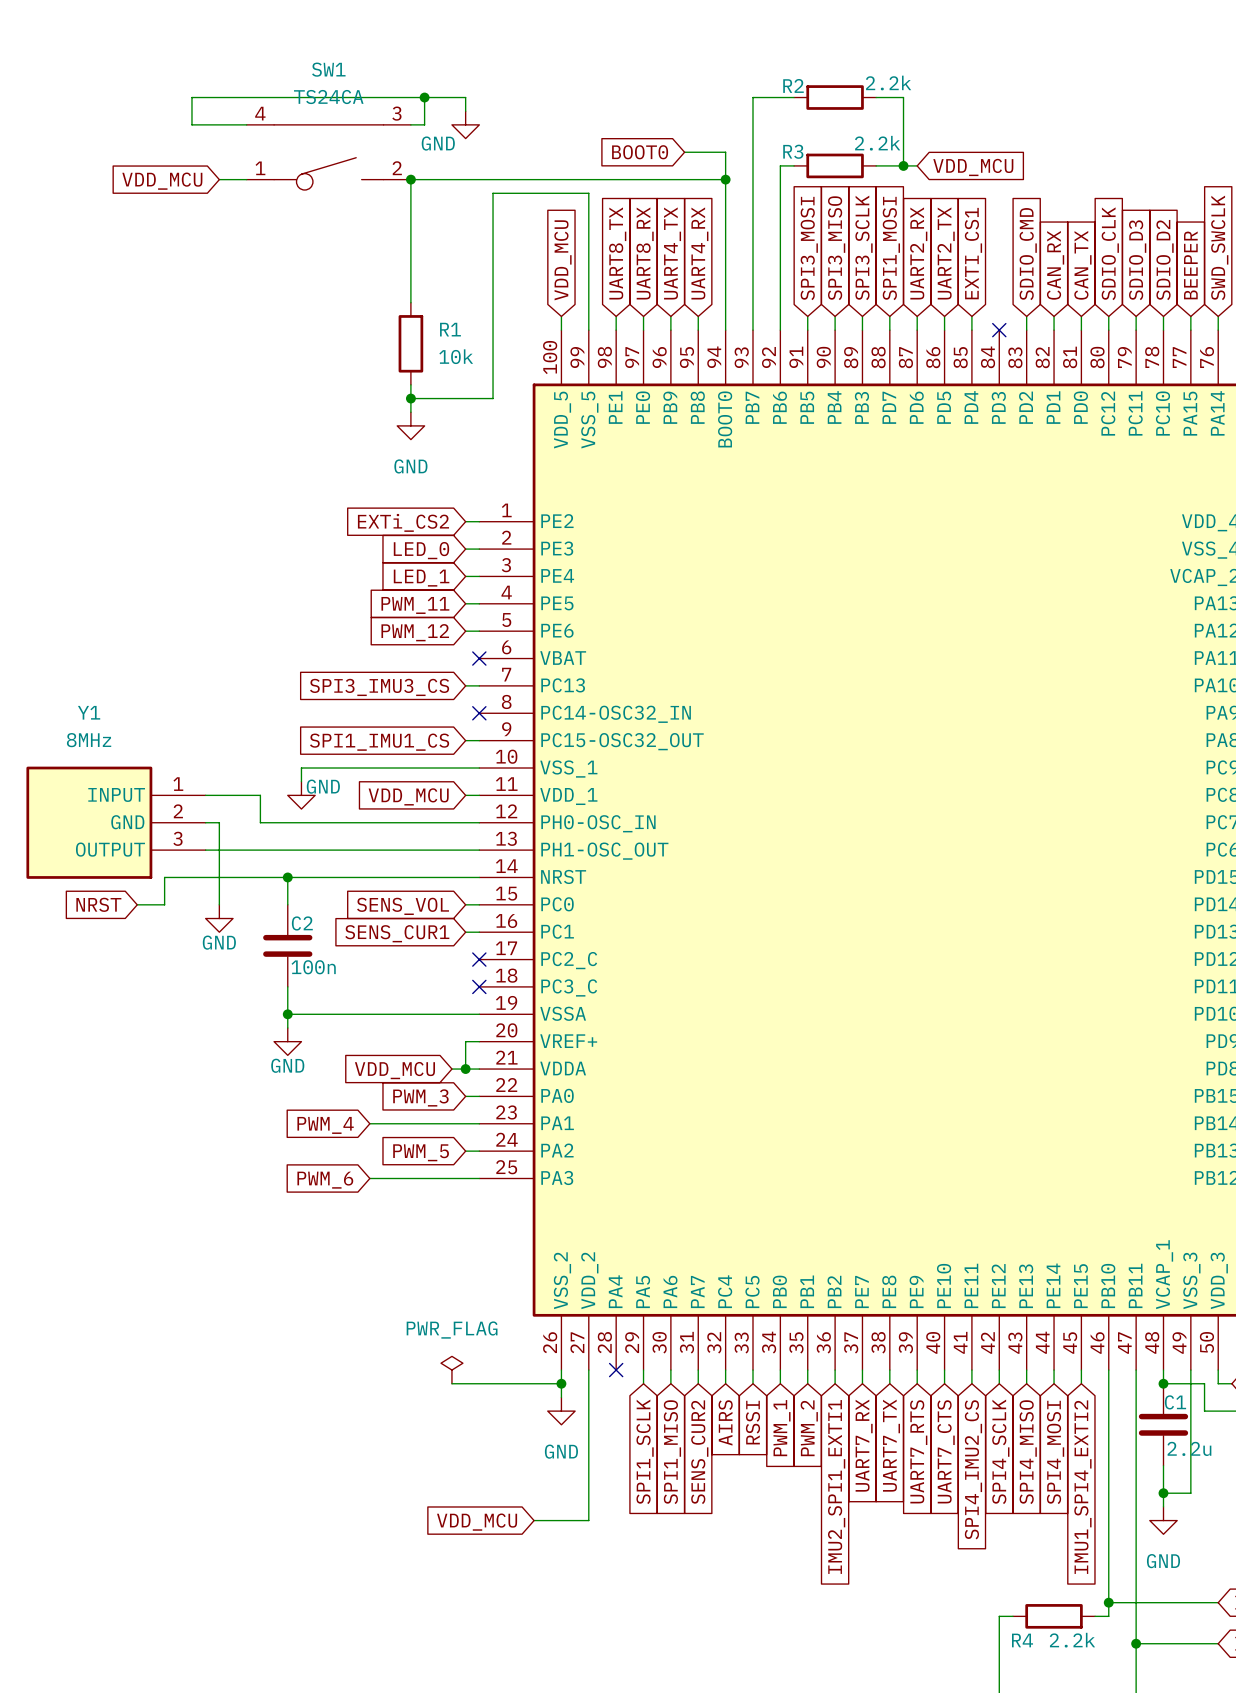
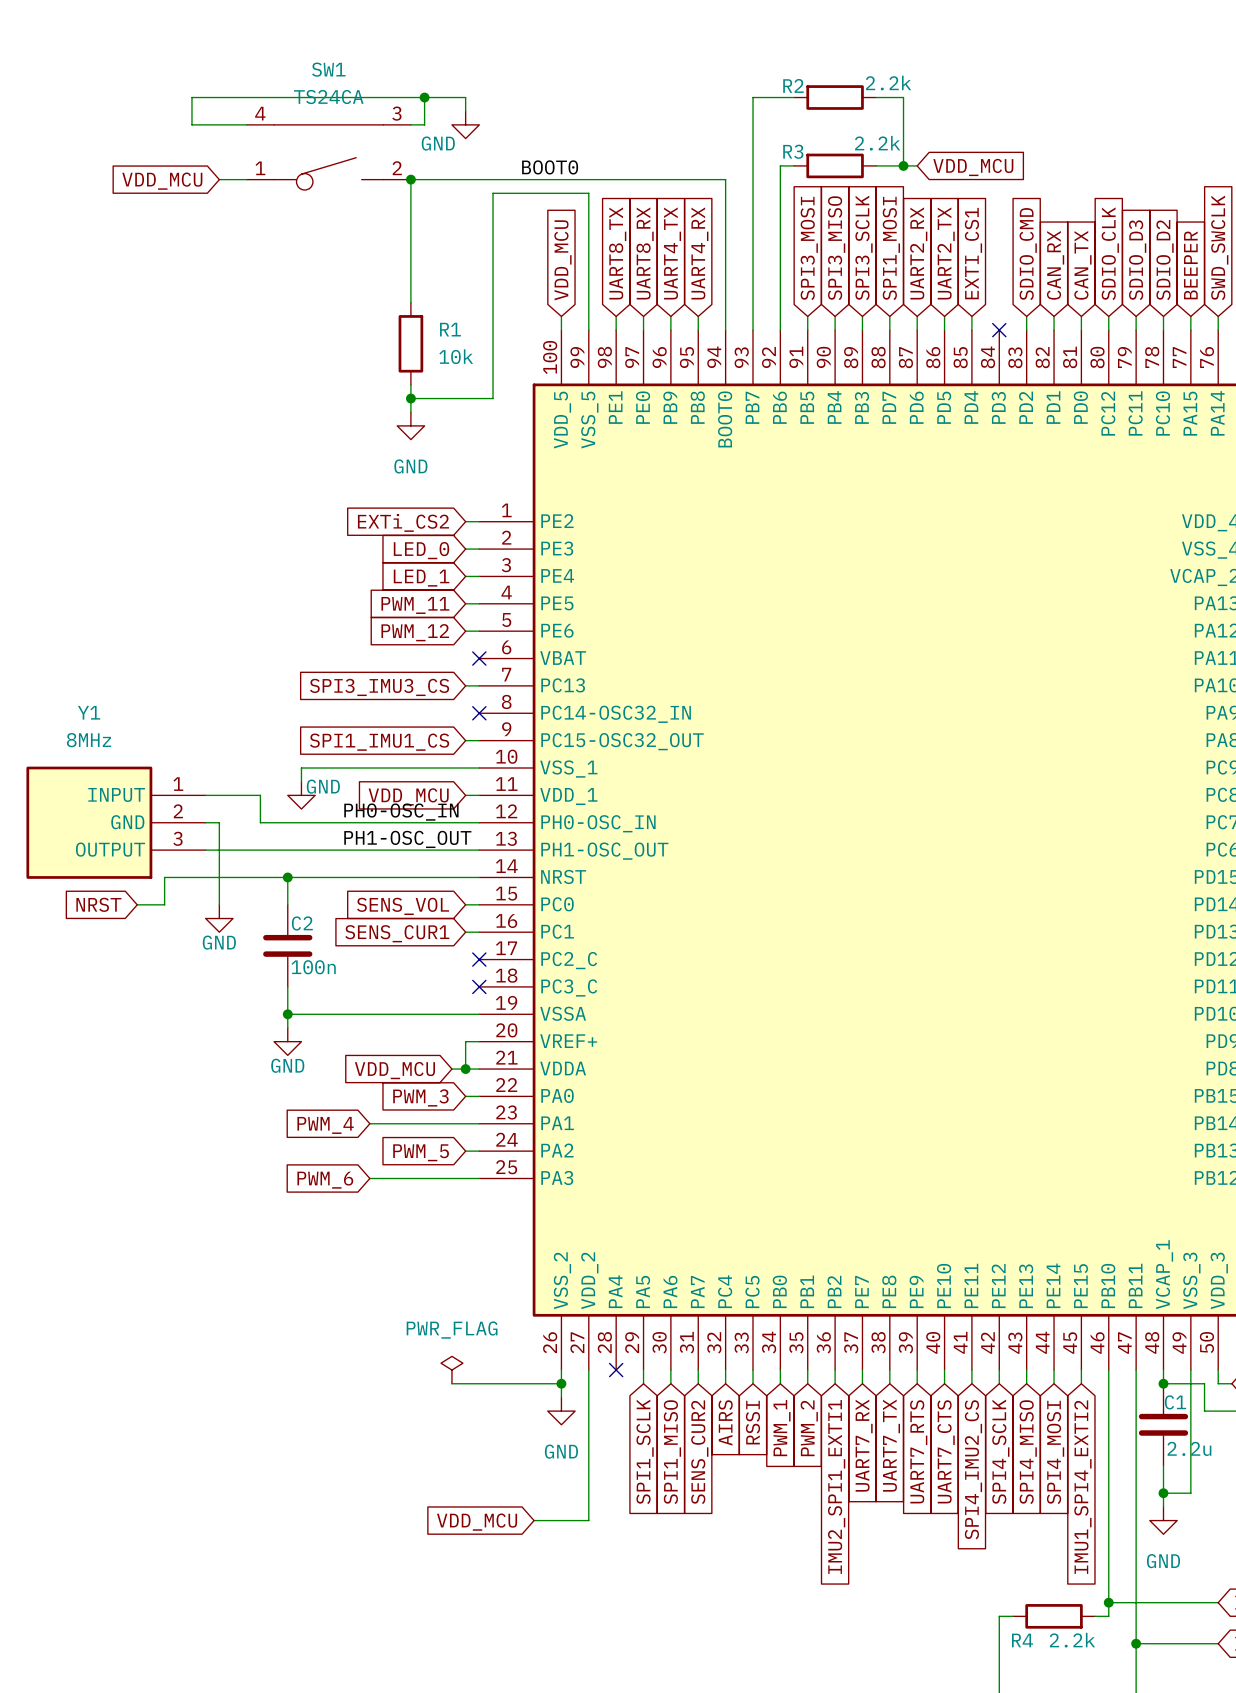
global label: BOOT0 (640, 152) -> none
wire: (684, 152) (725, 152) (725, 179) -> none
label: none -> BOOT0 (550, 167)
junction: (725, 179) -> none
label: none -> PH0-OSC_IN (401, 812)
label: none -> PH1-OSC_OUT (407, 839)

